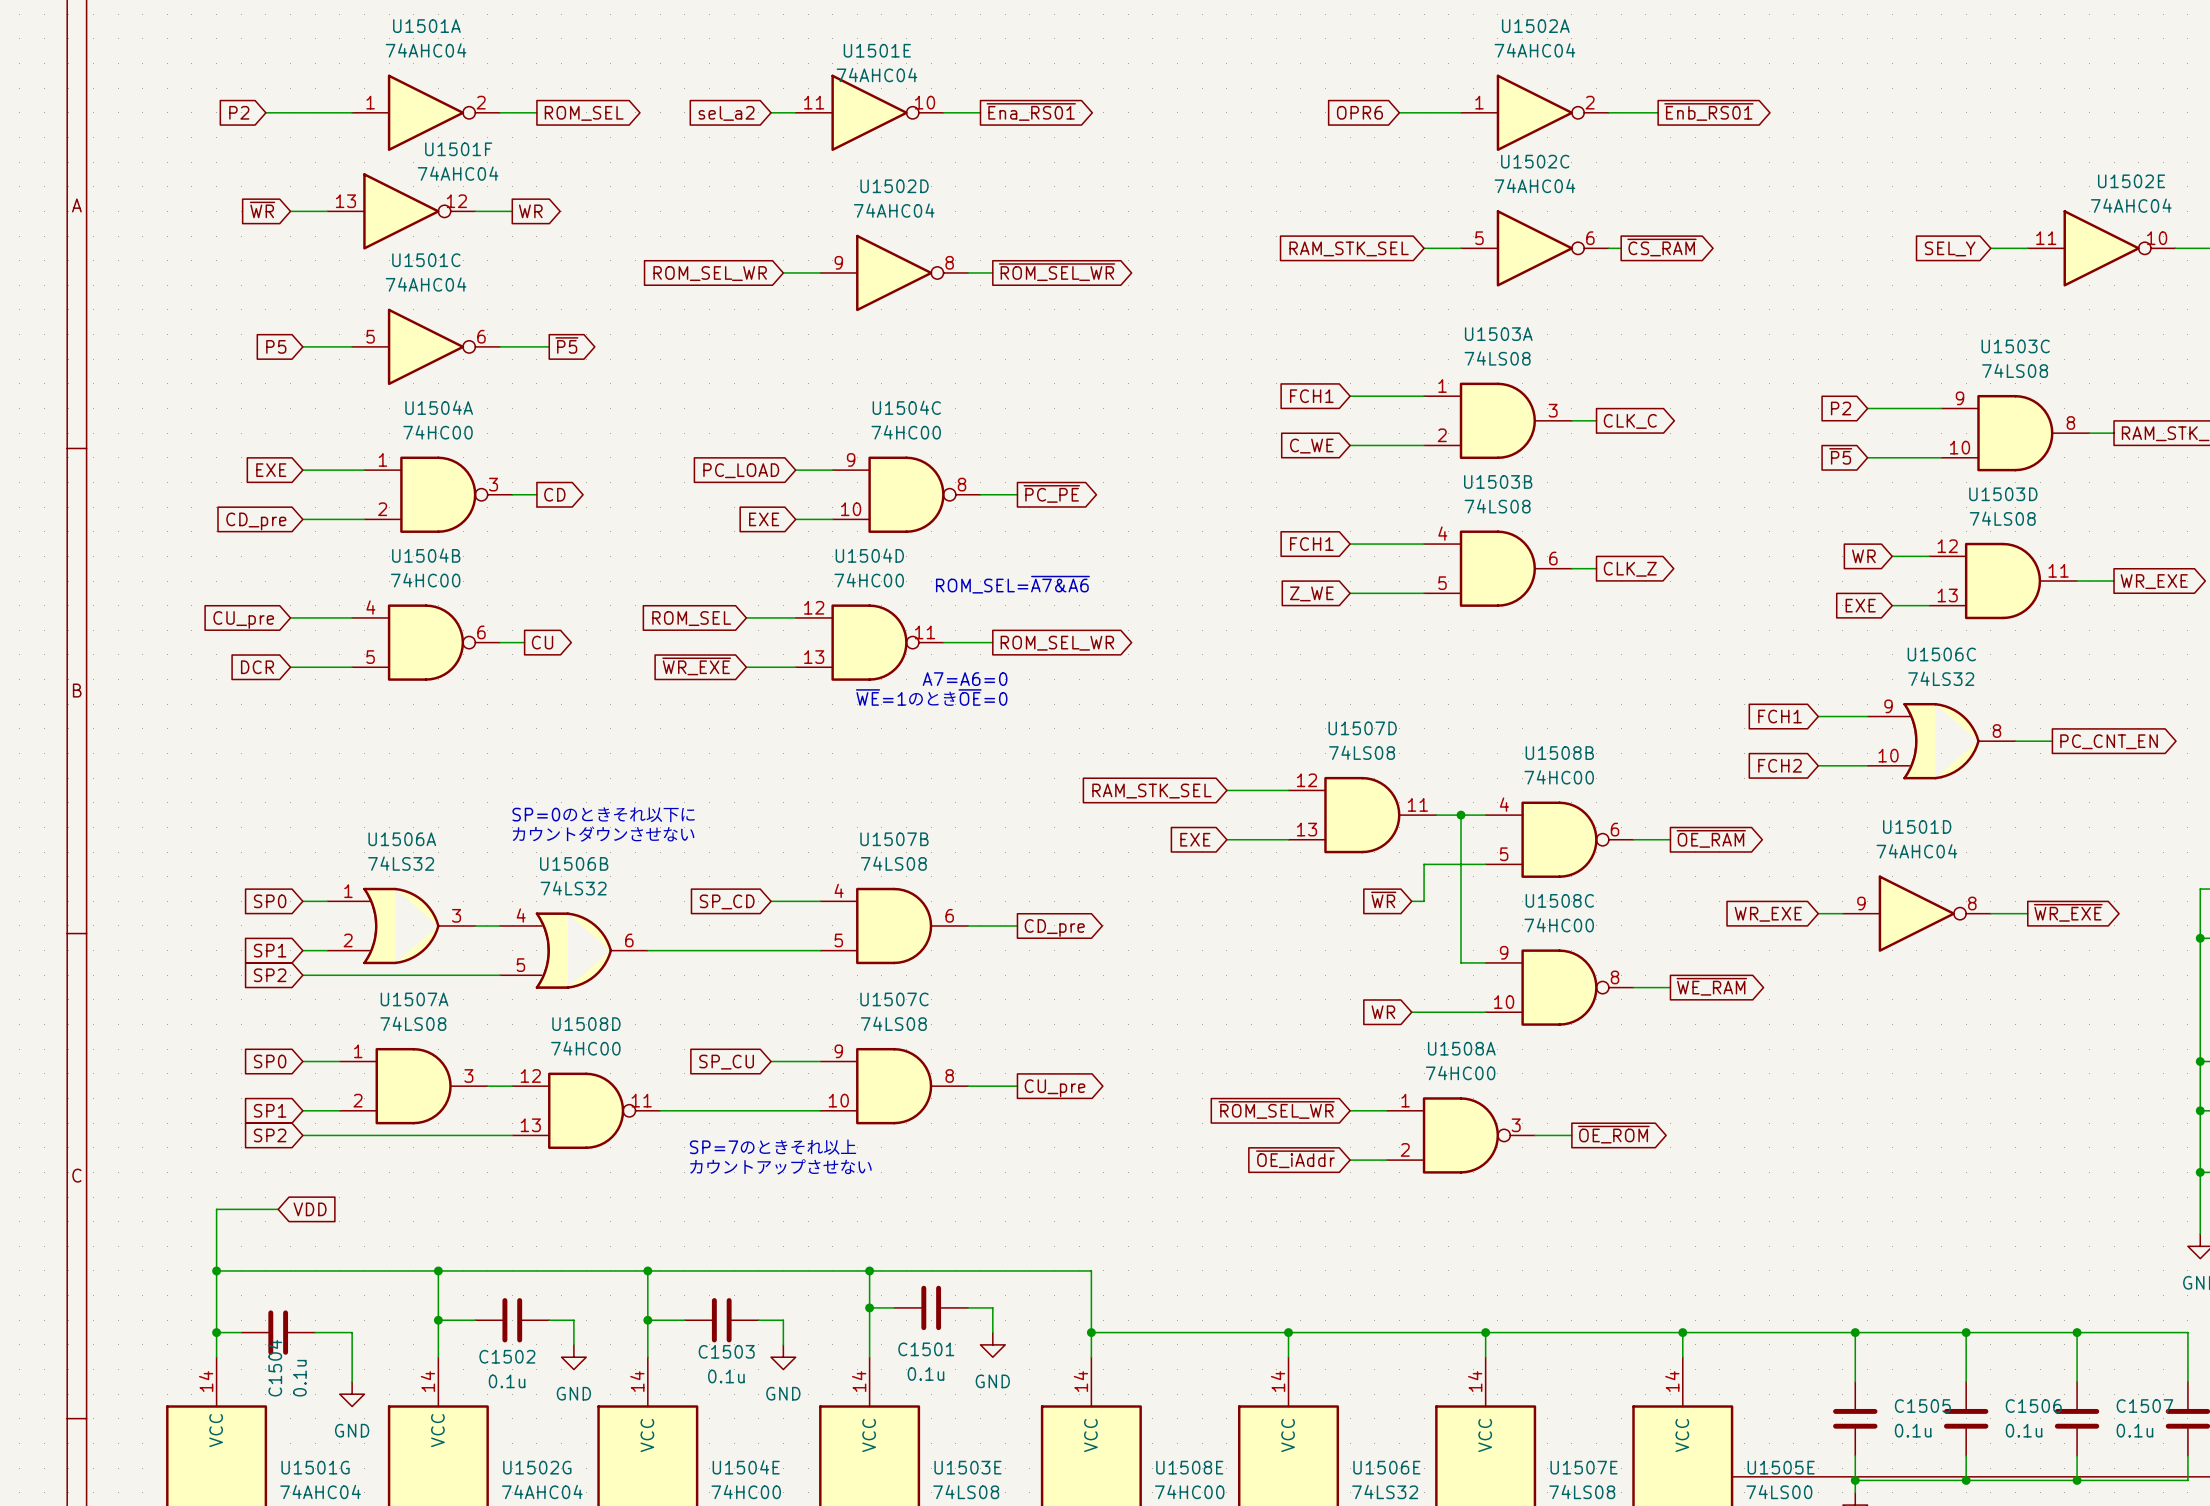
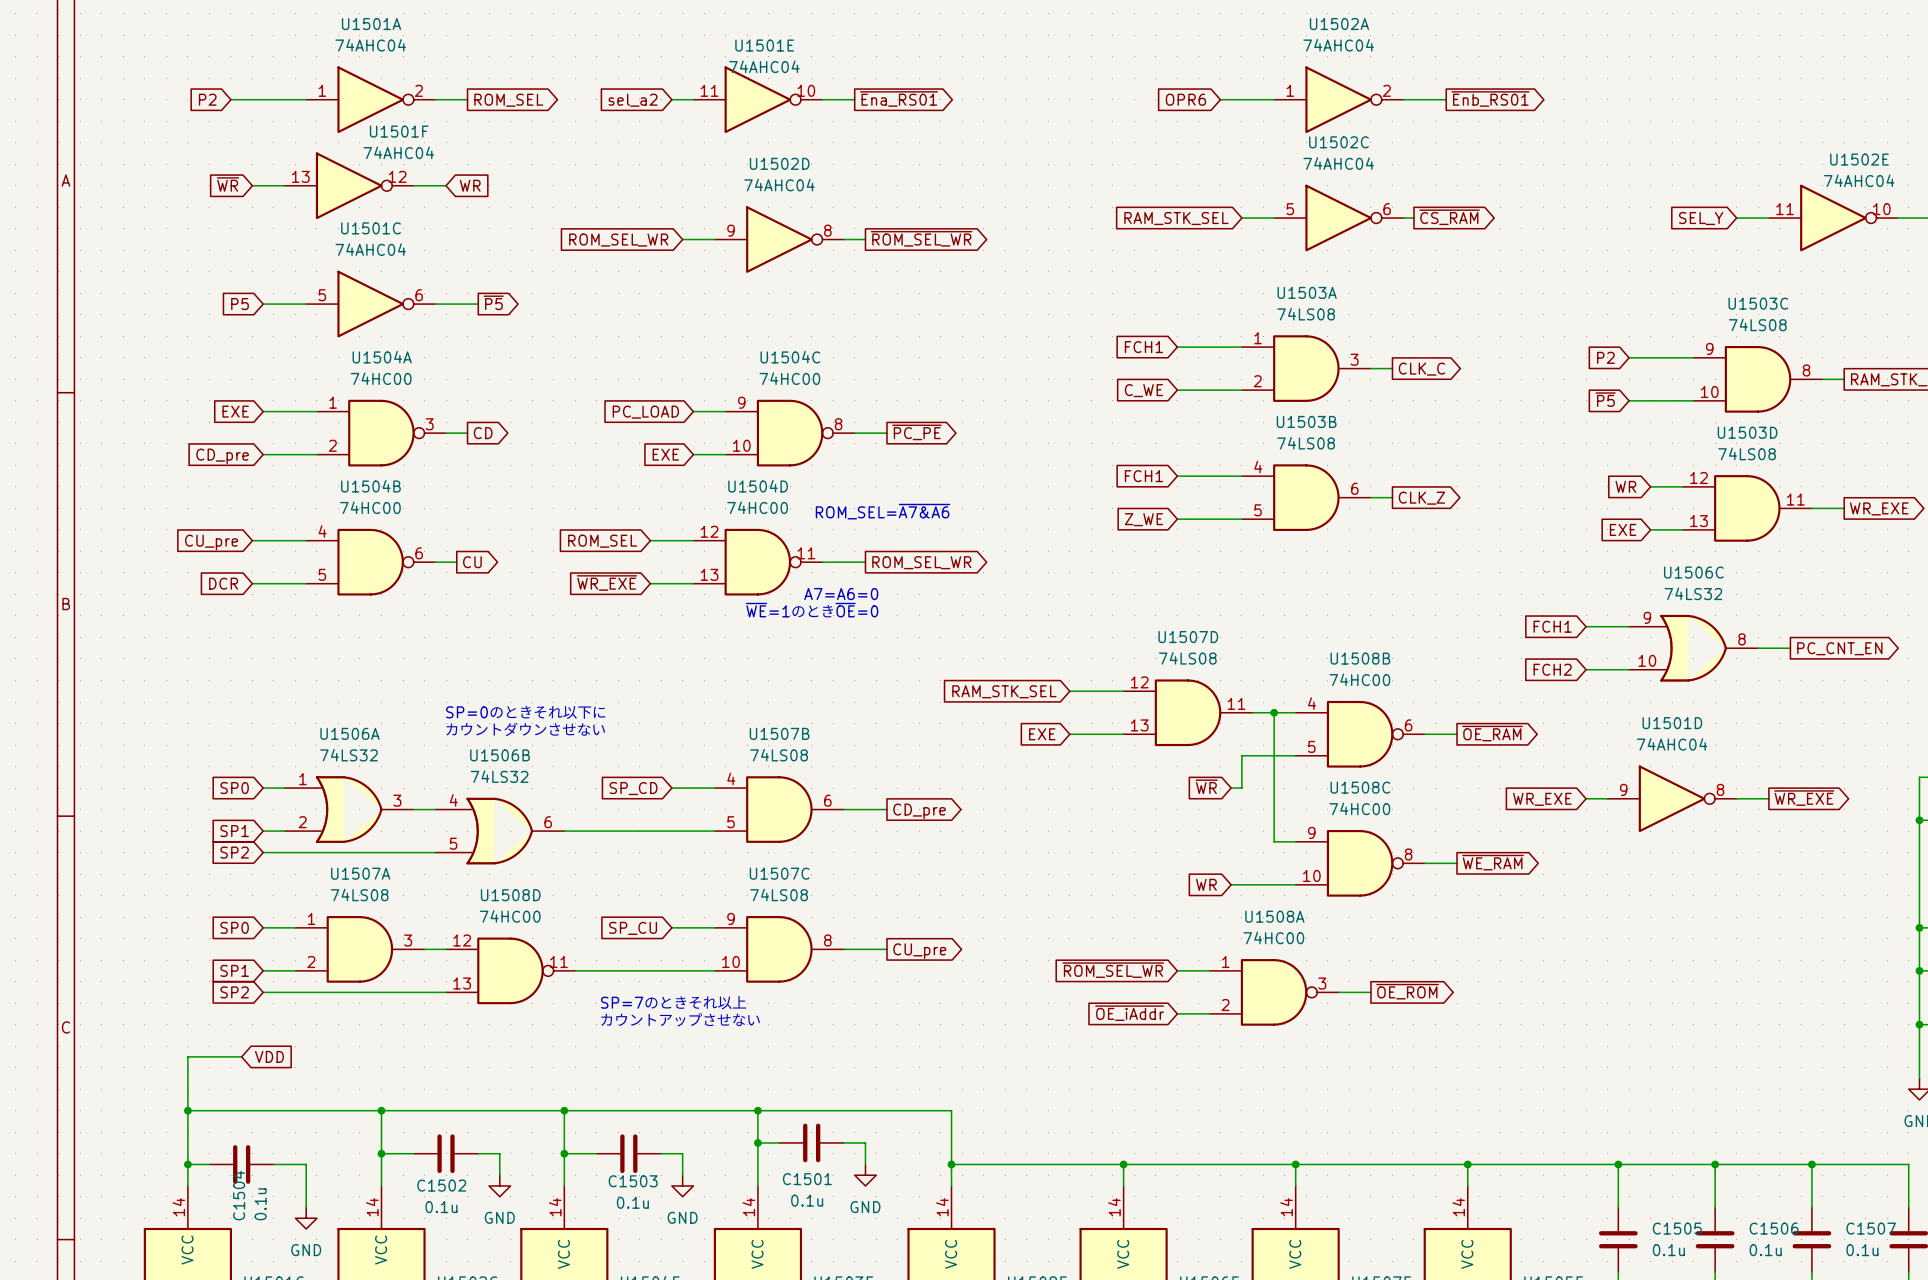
global label shape: output (530, 211) -> input (470, 185)

